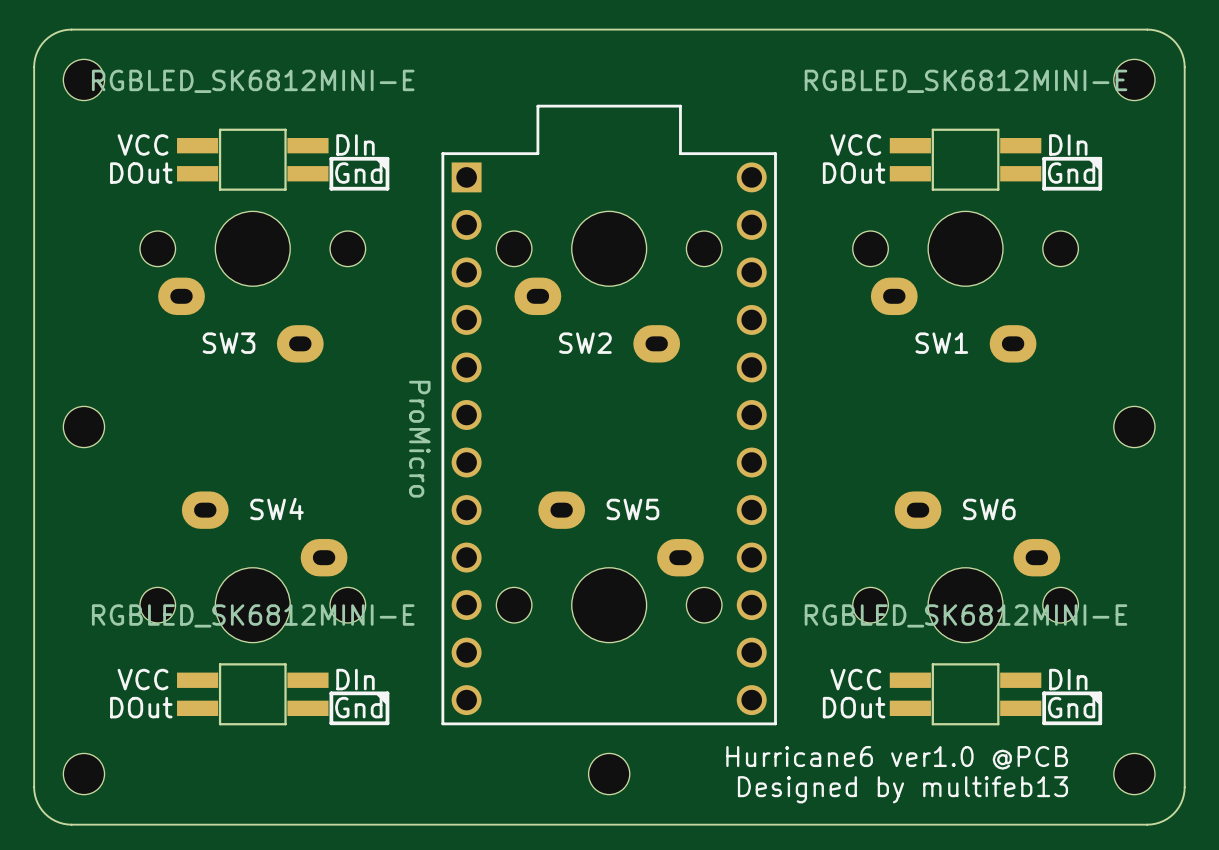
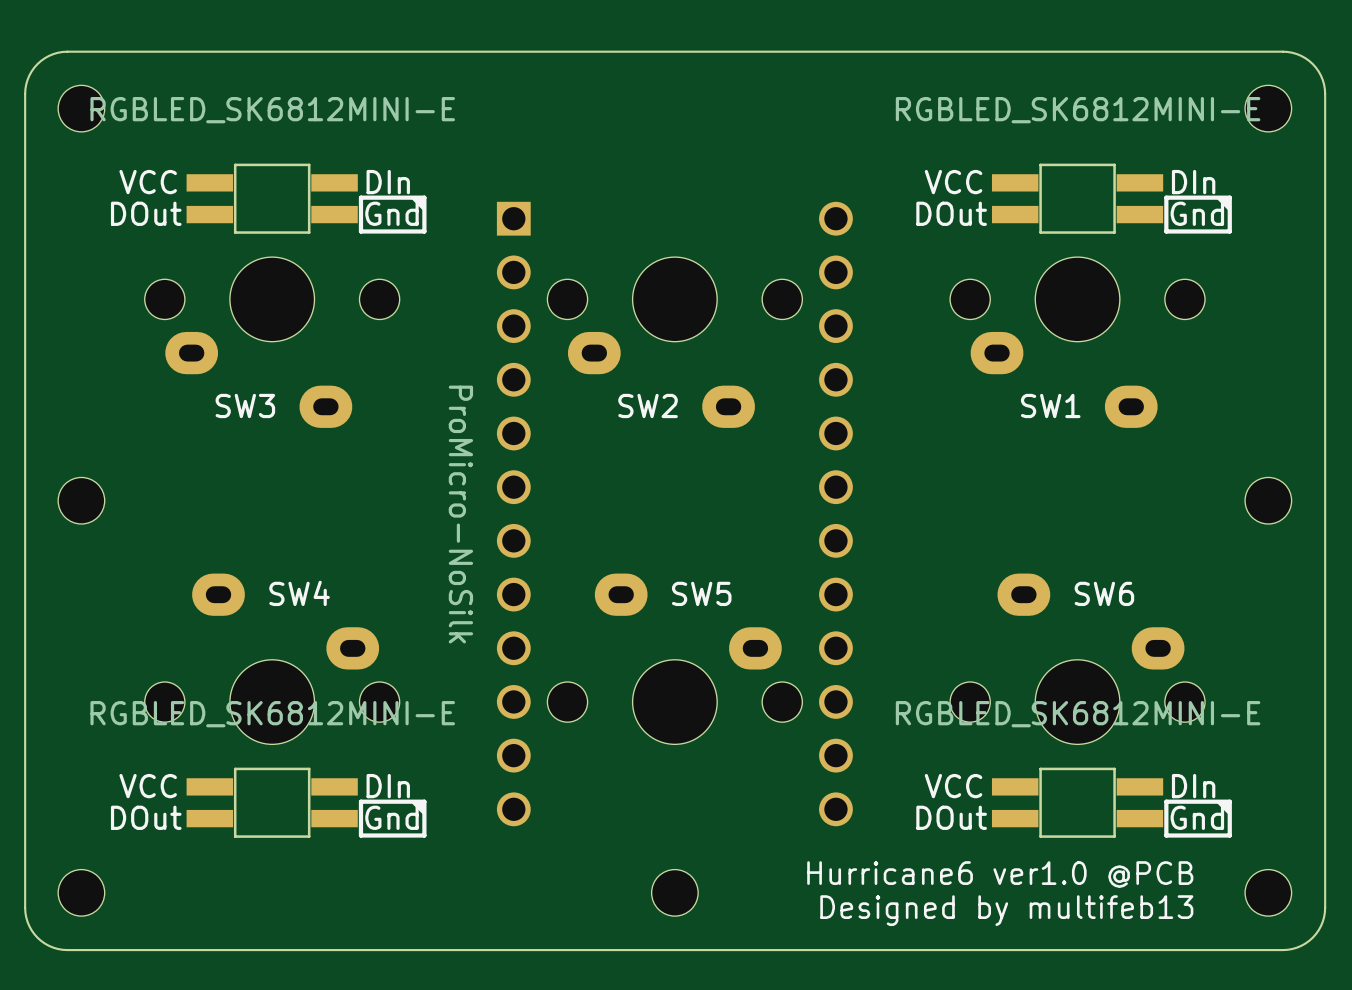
part: ProMicro (609, 415) -> none
part: none -> ProMicro-NoSilk (674, 514)

